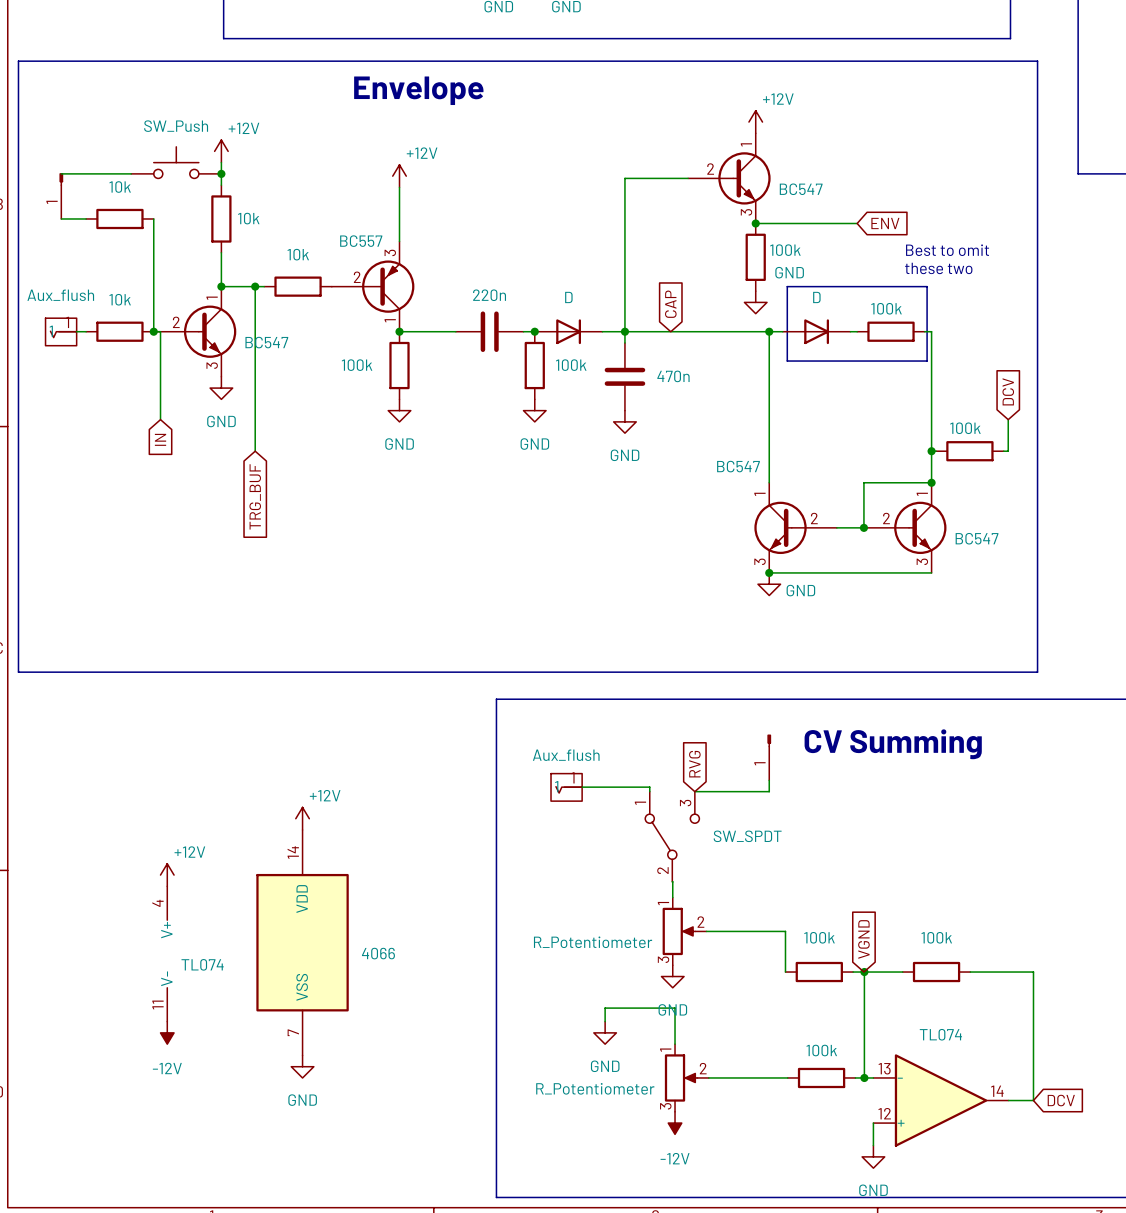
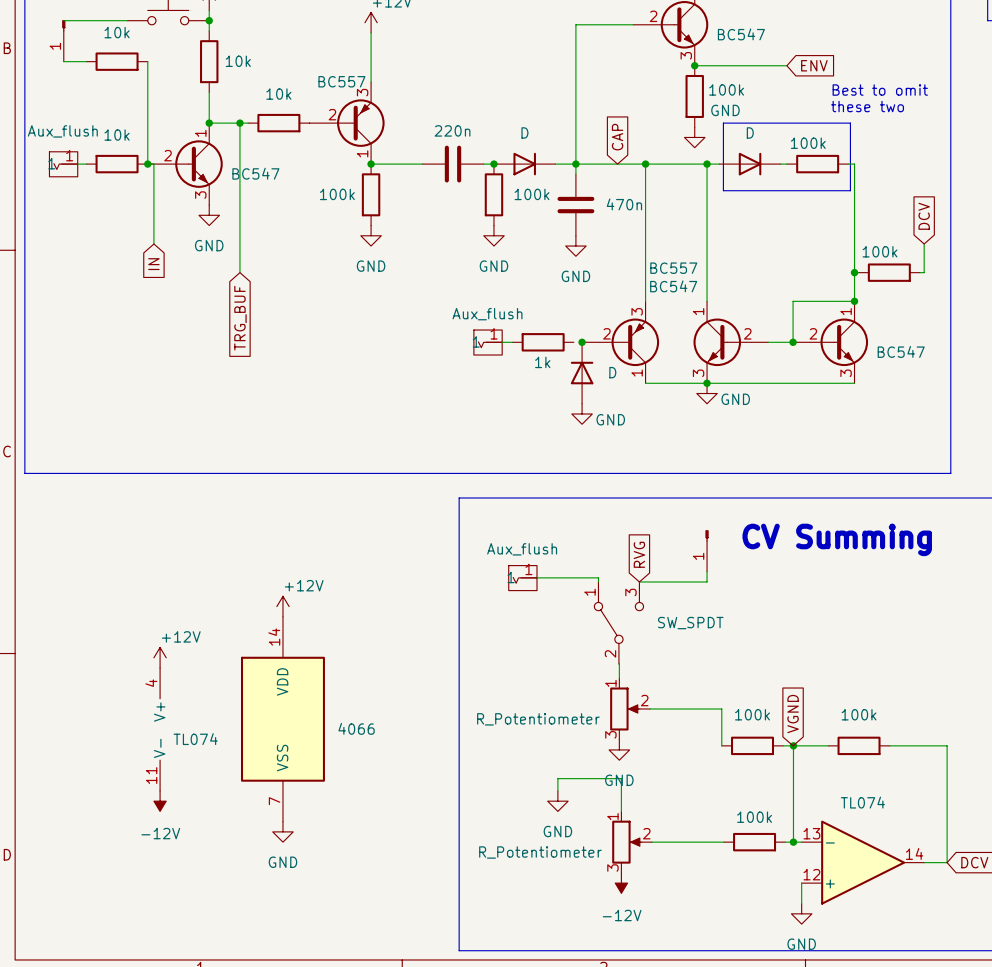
wire: none -> (645, 164) (645, 301)
junction: none -> (645, 164)
wire: none -> (502, 342) (512, 342)
part: none -> 1k (543, 342)
junction: none -> (582, 342)
part: none -> BC557 (621, 342)
part: none -> Aux_flush (488, 342)
part: none -> D (582, 373)
wire: none -> (645, 383) (707, 383)
power symbol: none -> GND (582, 414)

